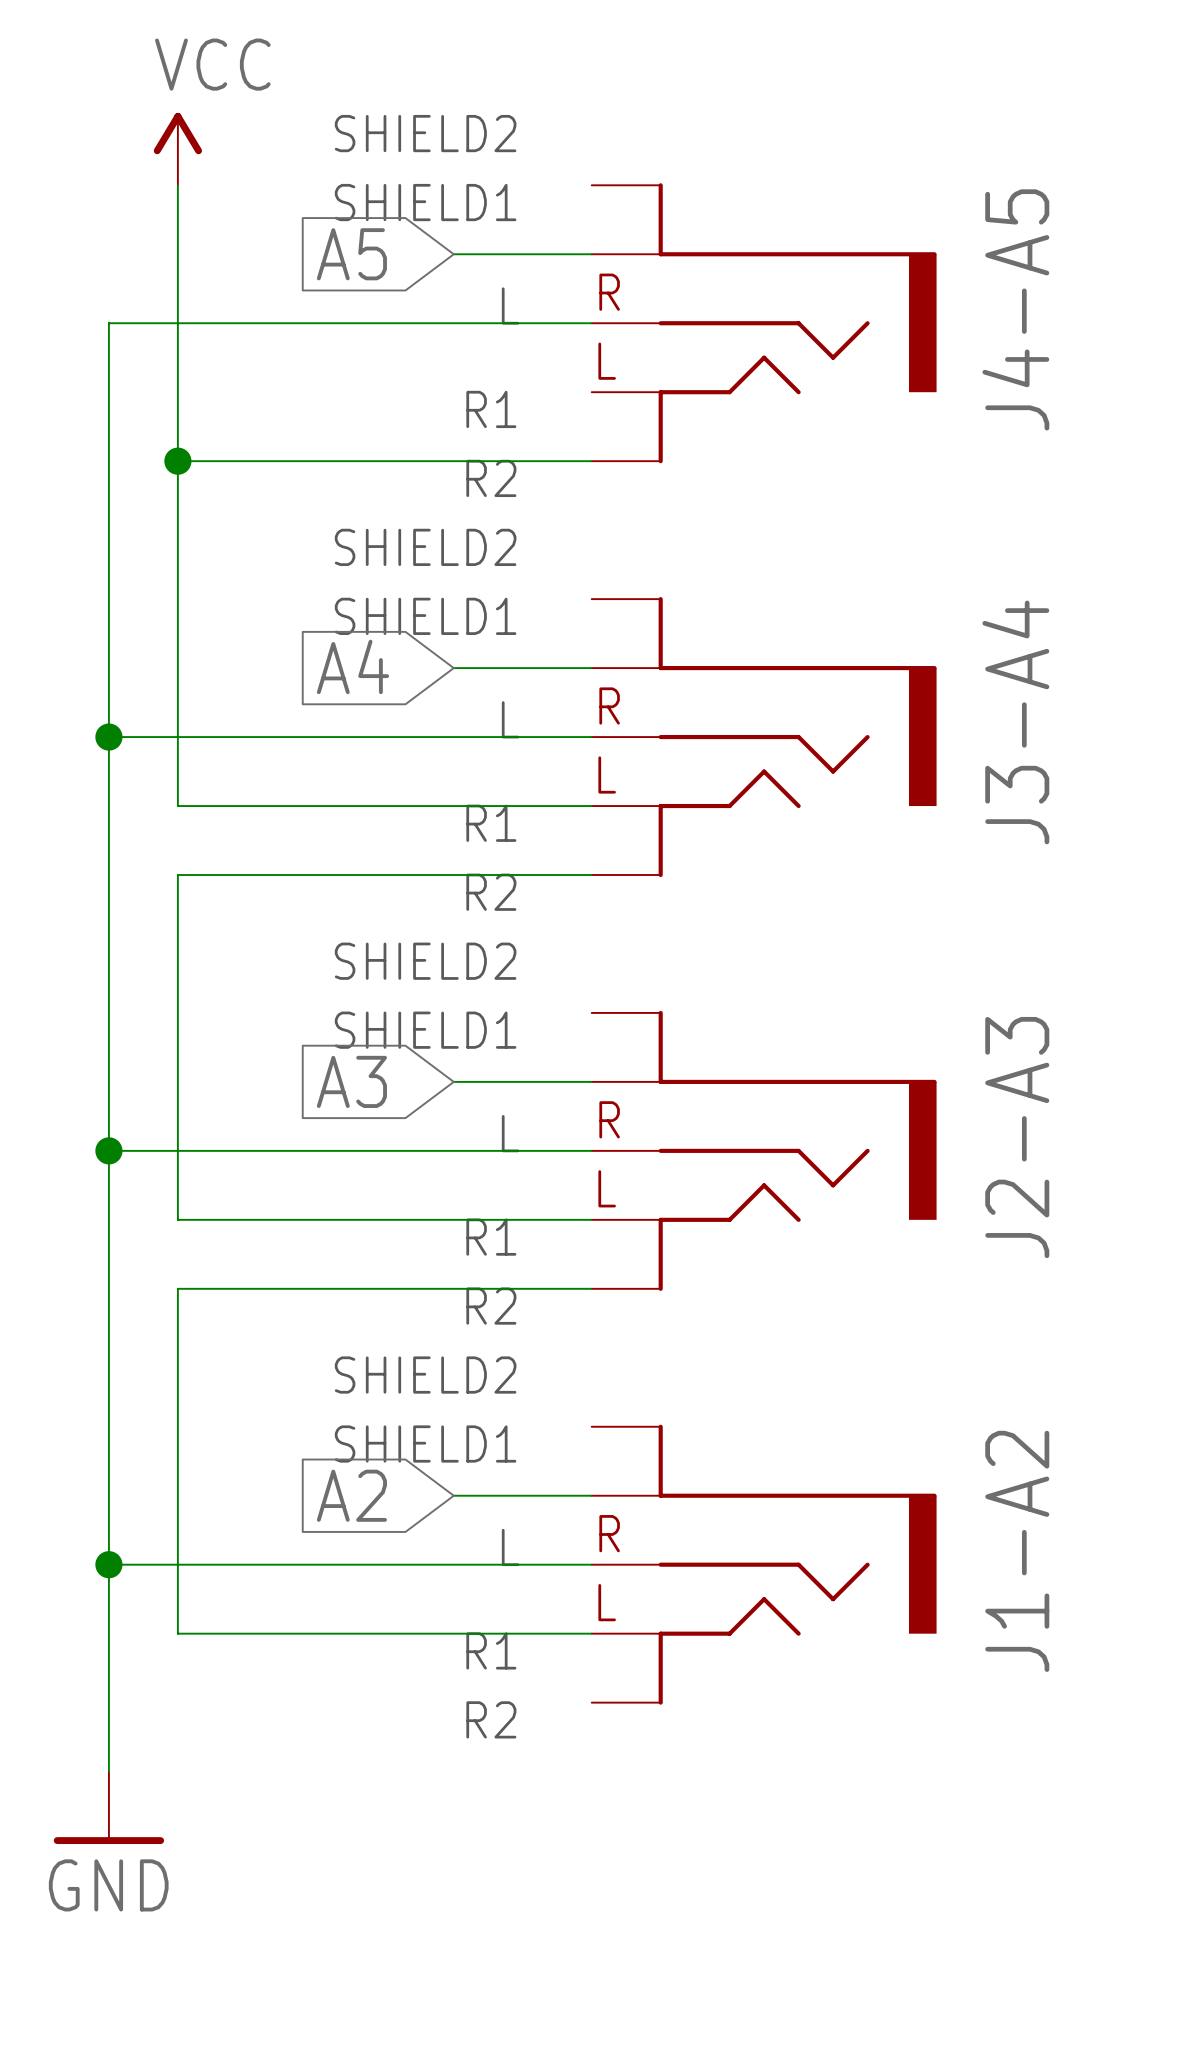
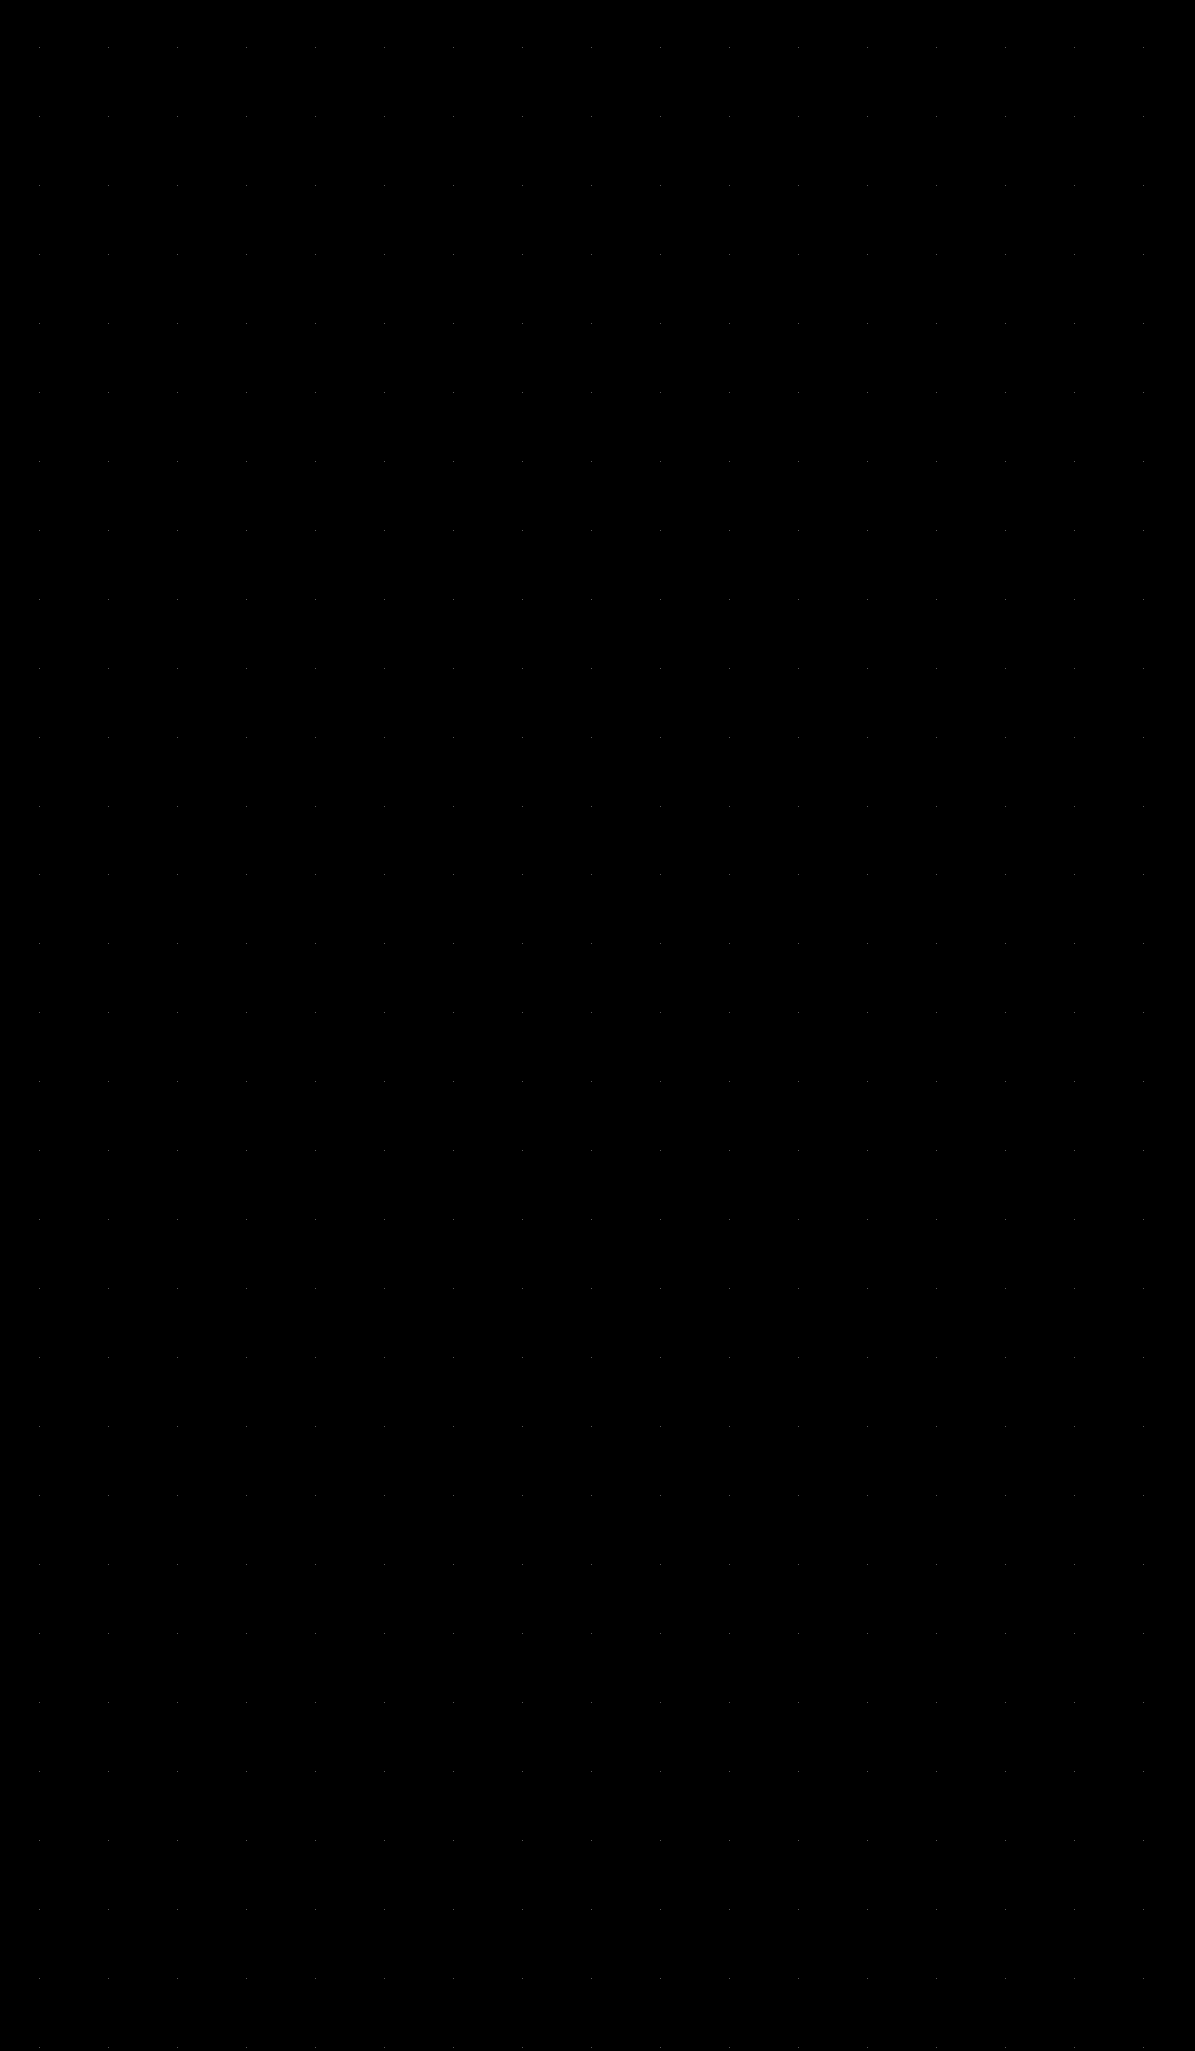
power symbol: VCC (177, 149) -> none
wire: (177, 185) (177, 806) (591, 806) -> none
global label: A5 (351, 254) -> none
wire: (453, 254) (591, 254) -> none
wire: (591, 323) (108, 323) (108, 1771) -> none
J4-A5: (764, 323) -> none
wire: (177, 461) (591, 461) -> none
junction: (177, 461) -> none
global label: A4 (352, 666) -> none
wire: (453, 668) (591, 668) -> none
wire: (108, 737) (591, 737) -> none
junction: (108, 737) -> none
J3-A4: (764, 737) -> none
wire: (591, 874) (177, 874) (177, 1219) (591, 1219) -> none
global label: A3 (351, 1081) -> none
wire: (453, 1081) (591, 1081) -> none
wire: (108, 1150) (591, 1150) -> none
junction: (108, 1150) -> none
J2-A3: (764, 1150) -> none
wire: (591, 1288) (177, 1288) (177, 1633) (591, 1633) -> none
global label: A2 (351, 1495) -> none
wire: (453, 1495) (591, 1495) -> none
wire: (108, 1564) (591, 1564) -> none
junction: (108, 1564) -> none
J1-A2: (764, 1564) -> none
power symbol: GND (108, 1807) -> none

